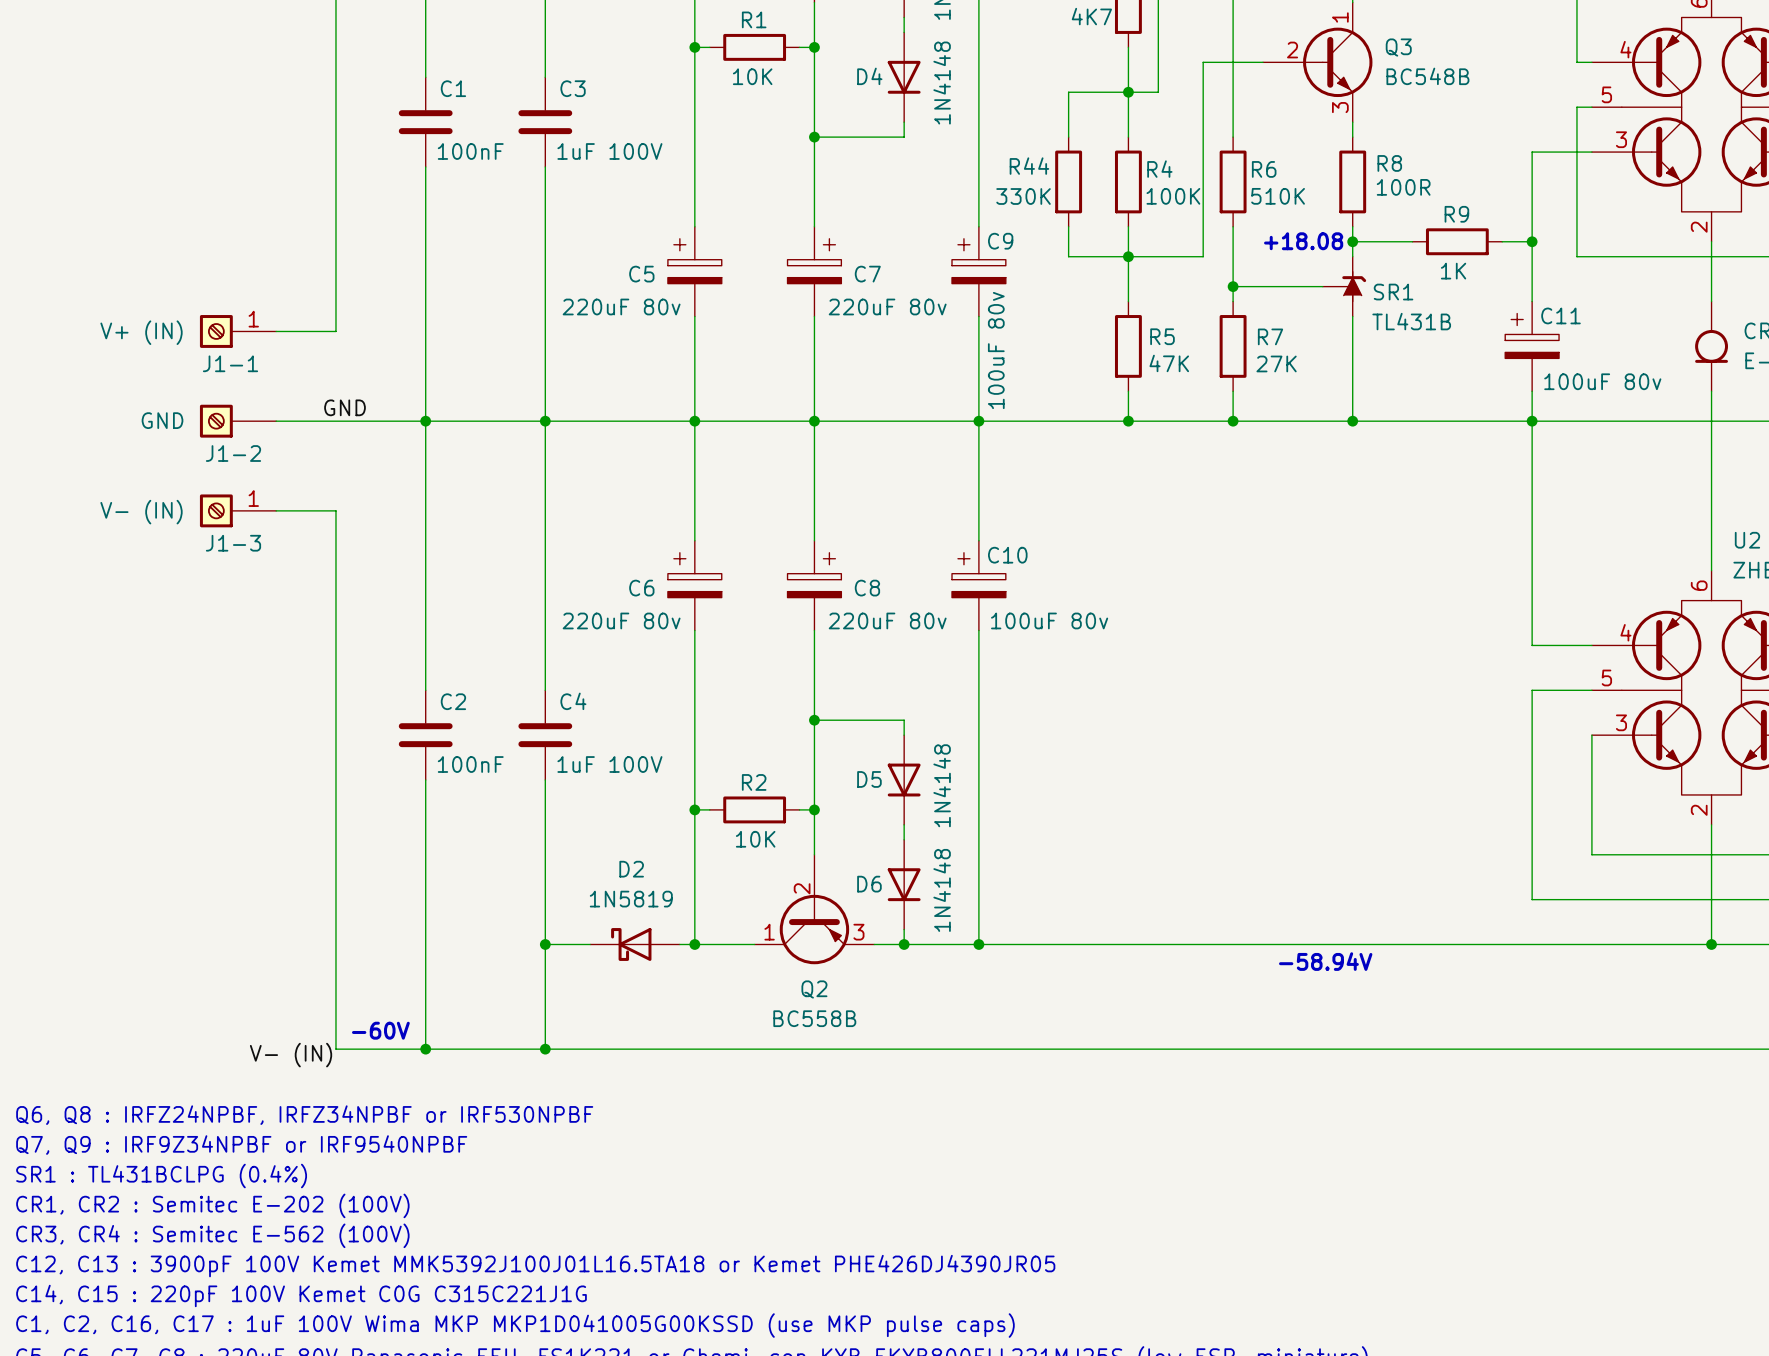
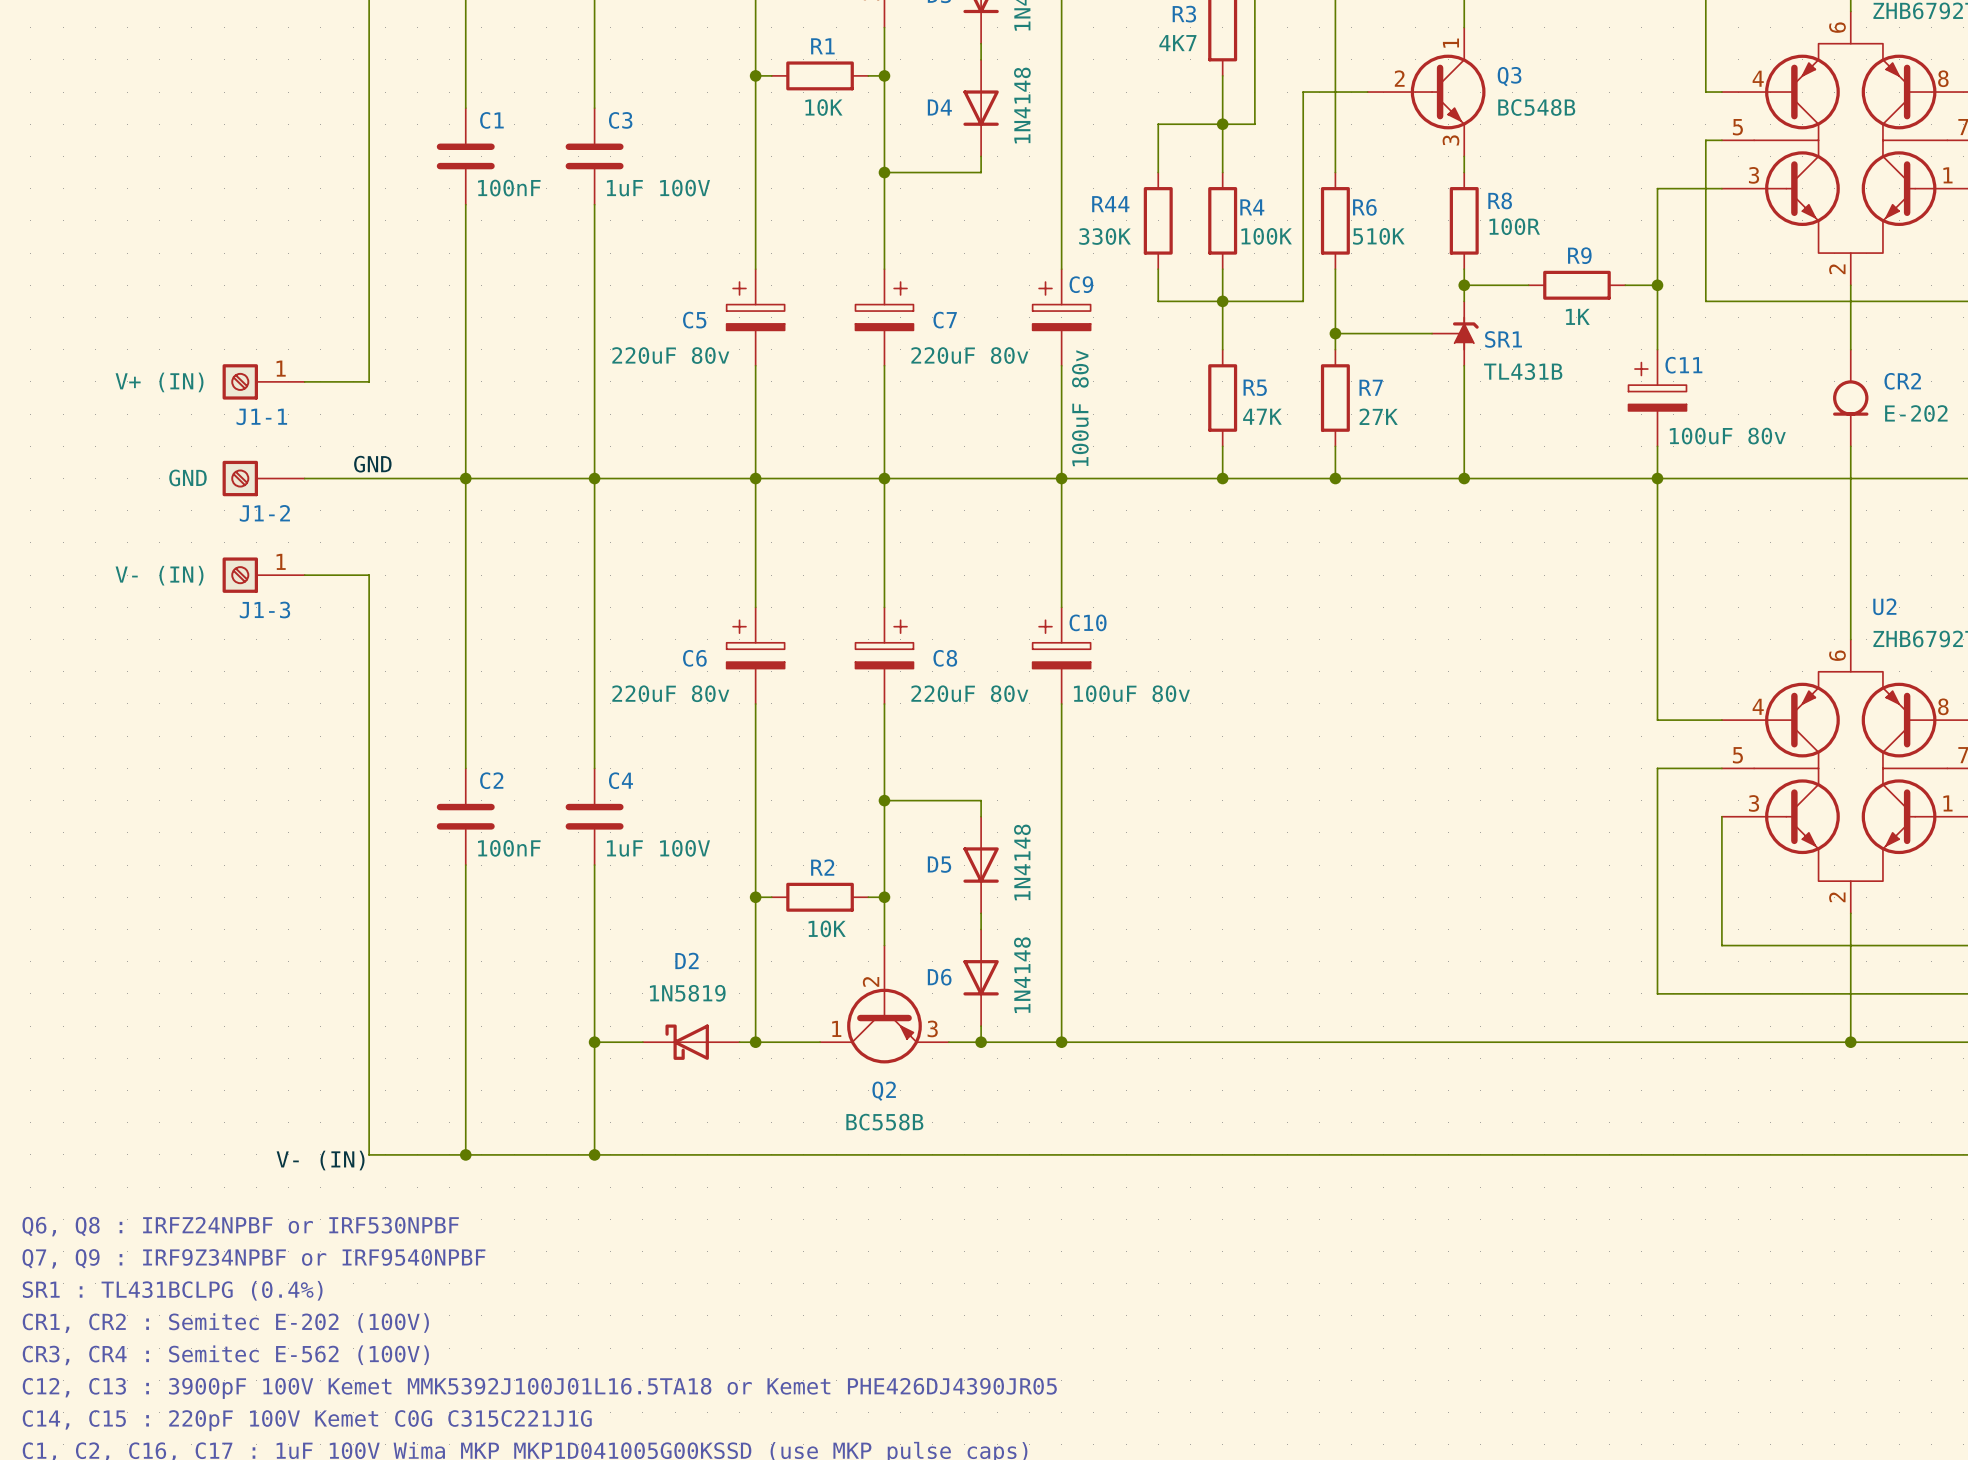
text: +18.08 (1303, 241) -> none
text: -58.94V (1325, 961) -> none
text: -60V (380, 1030) -> none
text: Q6, Q8 : IRFZ24NPBF, IRFZ34NPBF or IRF530NPBF (304, 1115) -> Q6, Q8 : IRFZ24NPBF or IRF530NPBF (240, 1226)

